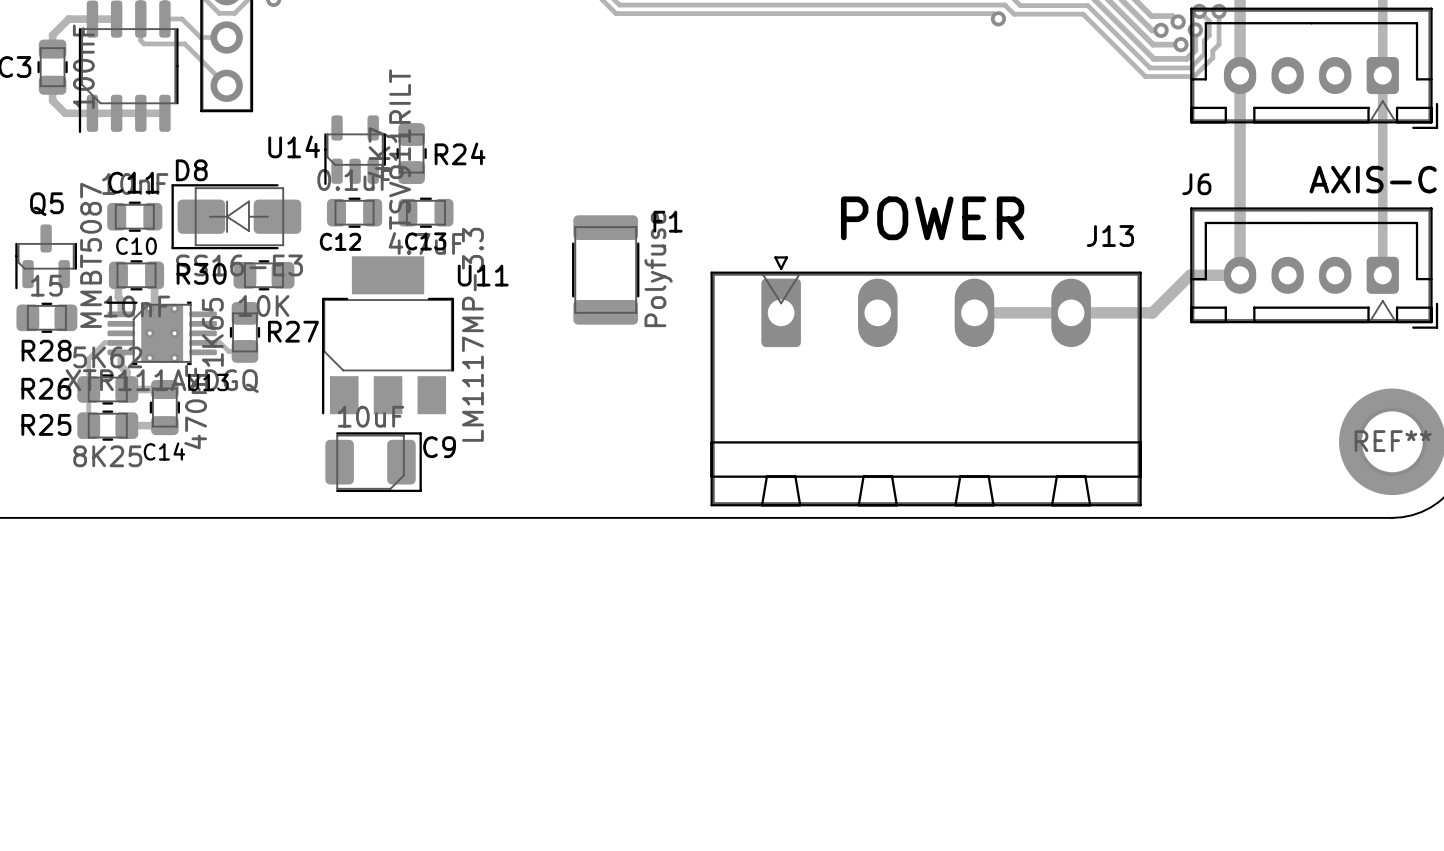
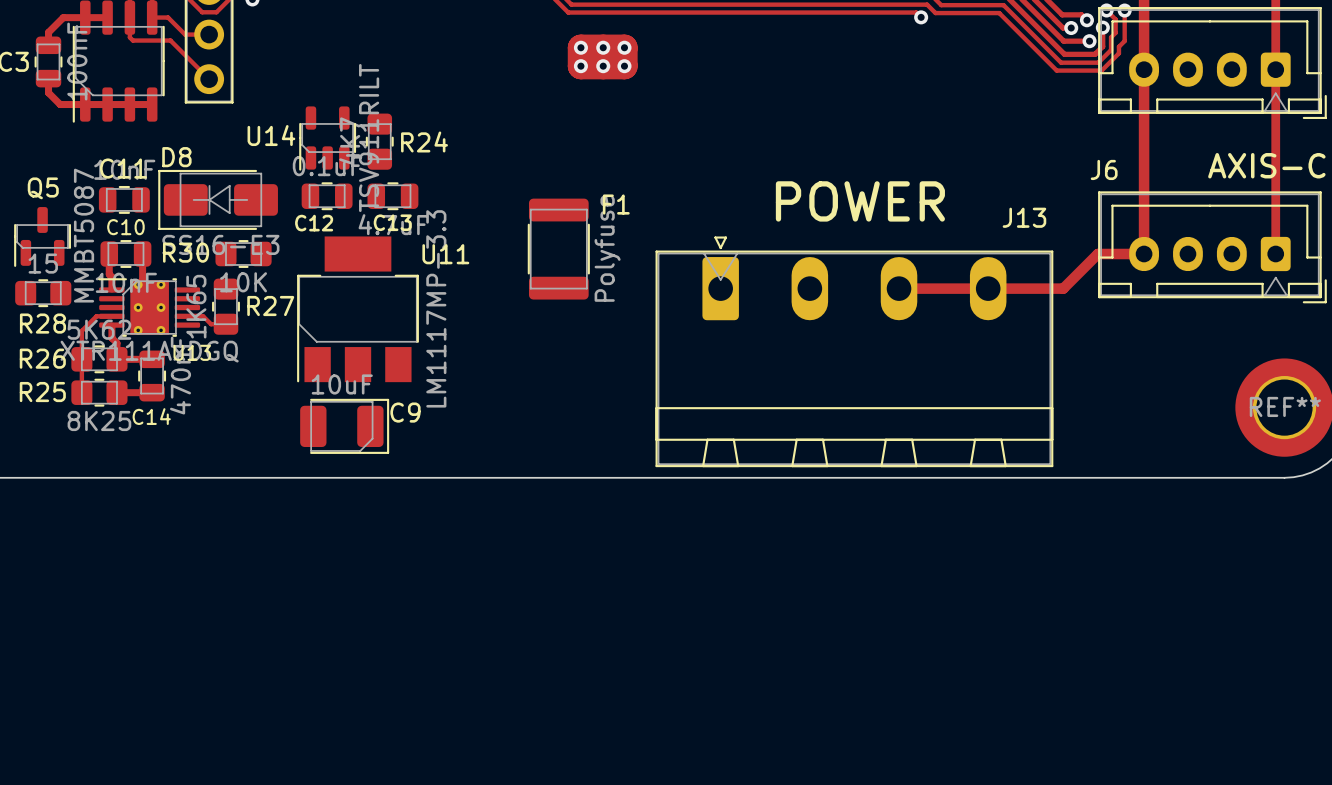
track: none -> (580, 47) (624, 47) (624, 66) (580, 66) (580, 47)
via: none -> (580, 47)
via: none -> (603, 47)
via: none -> (624, 47)
via: none -> (580, 66)
via: none -> (603, 66)
via: none -> (624, 66)

